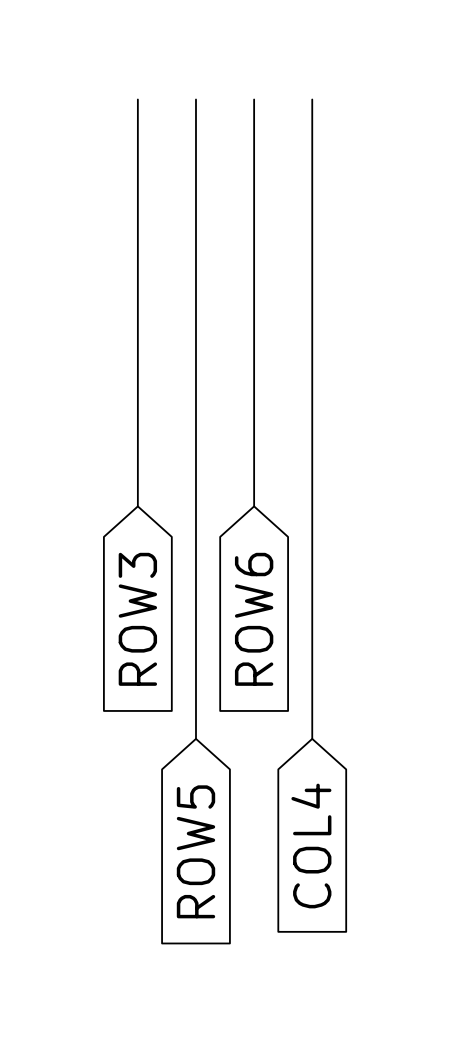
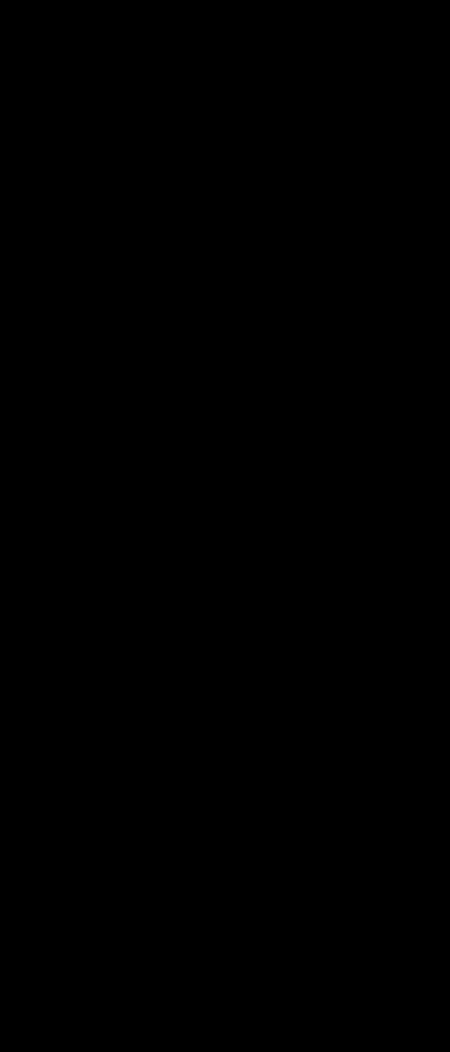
wire: (137, 99) (137, 506) -> none
wire: (195, 99) (195, 738) -> none
wire: (254, 99) (254, 506) -> none
wire: (312, 99) (312, 738) -> none
global label: ROW3 (137, 619) -> none
global label: ROW6 (254, 619) -> none
global label: COL4 (311, 846) -> none
global label: ROW5 (195, 851) -> none

